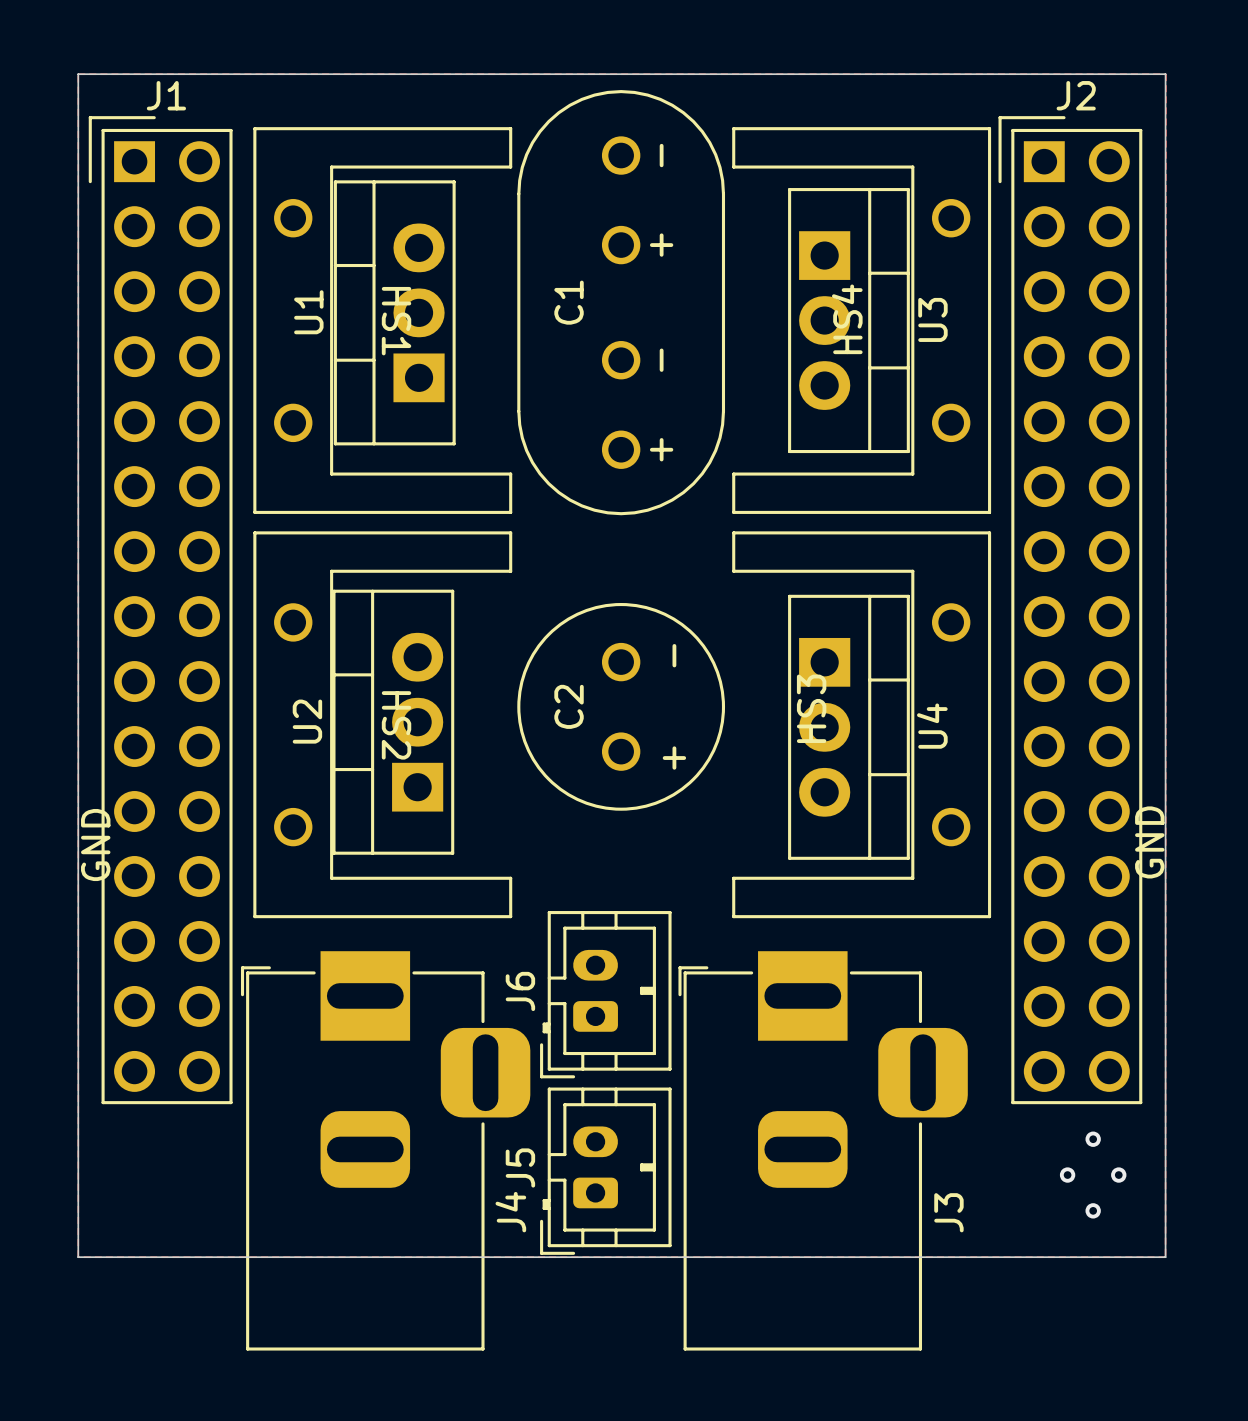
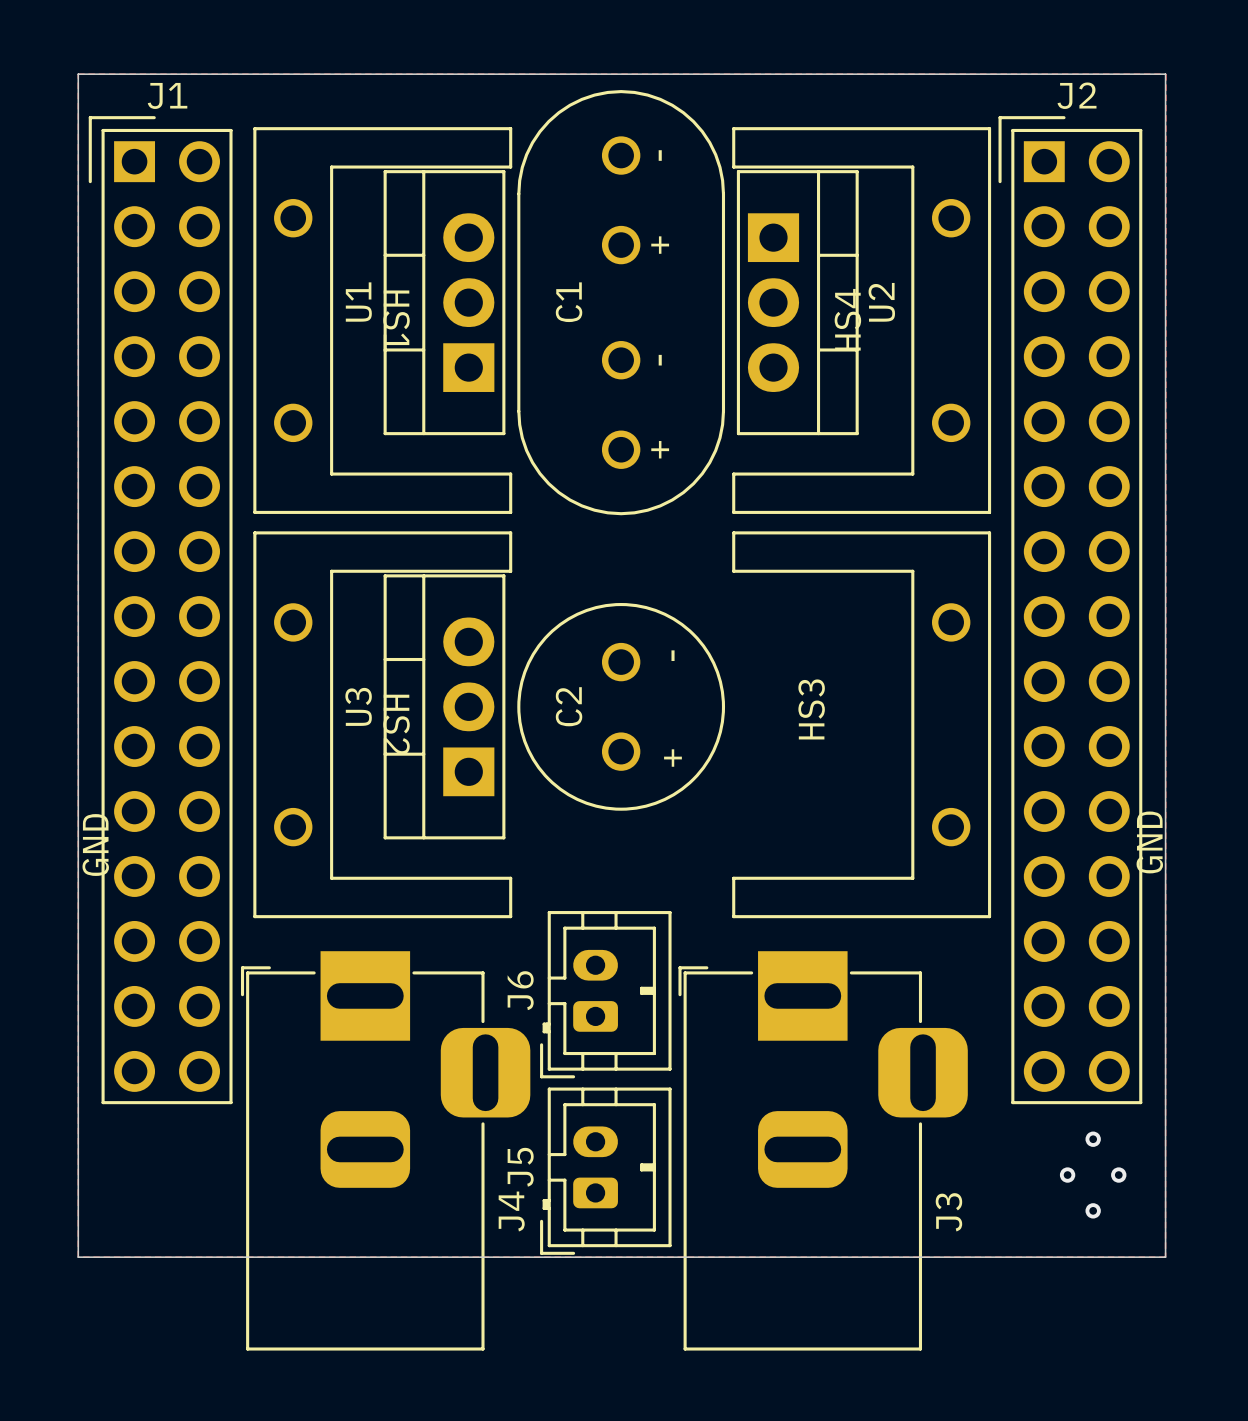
U1 position: (394, 312) -> (444, 302)
U3 rotation: 0° (848, 320) -> 180° (444, 706)
U3 position: (848, 320) -> (444, 706)
U2 rotation: 0° (393, 722) -> 180° (797, 302)
U2 position: (393, 722) -> (797, 302)
U4: (848, 727) -> none

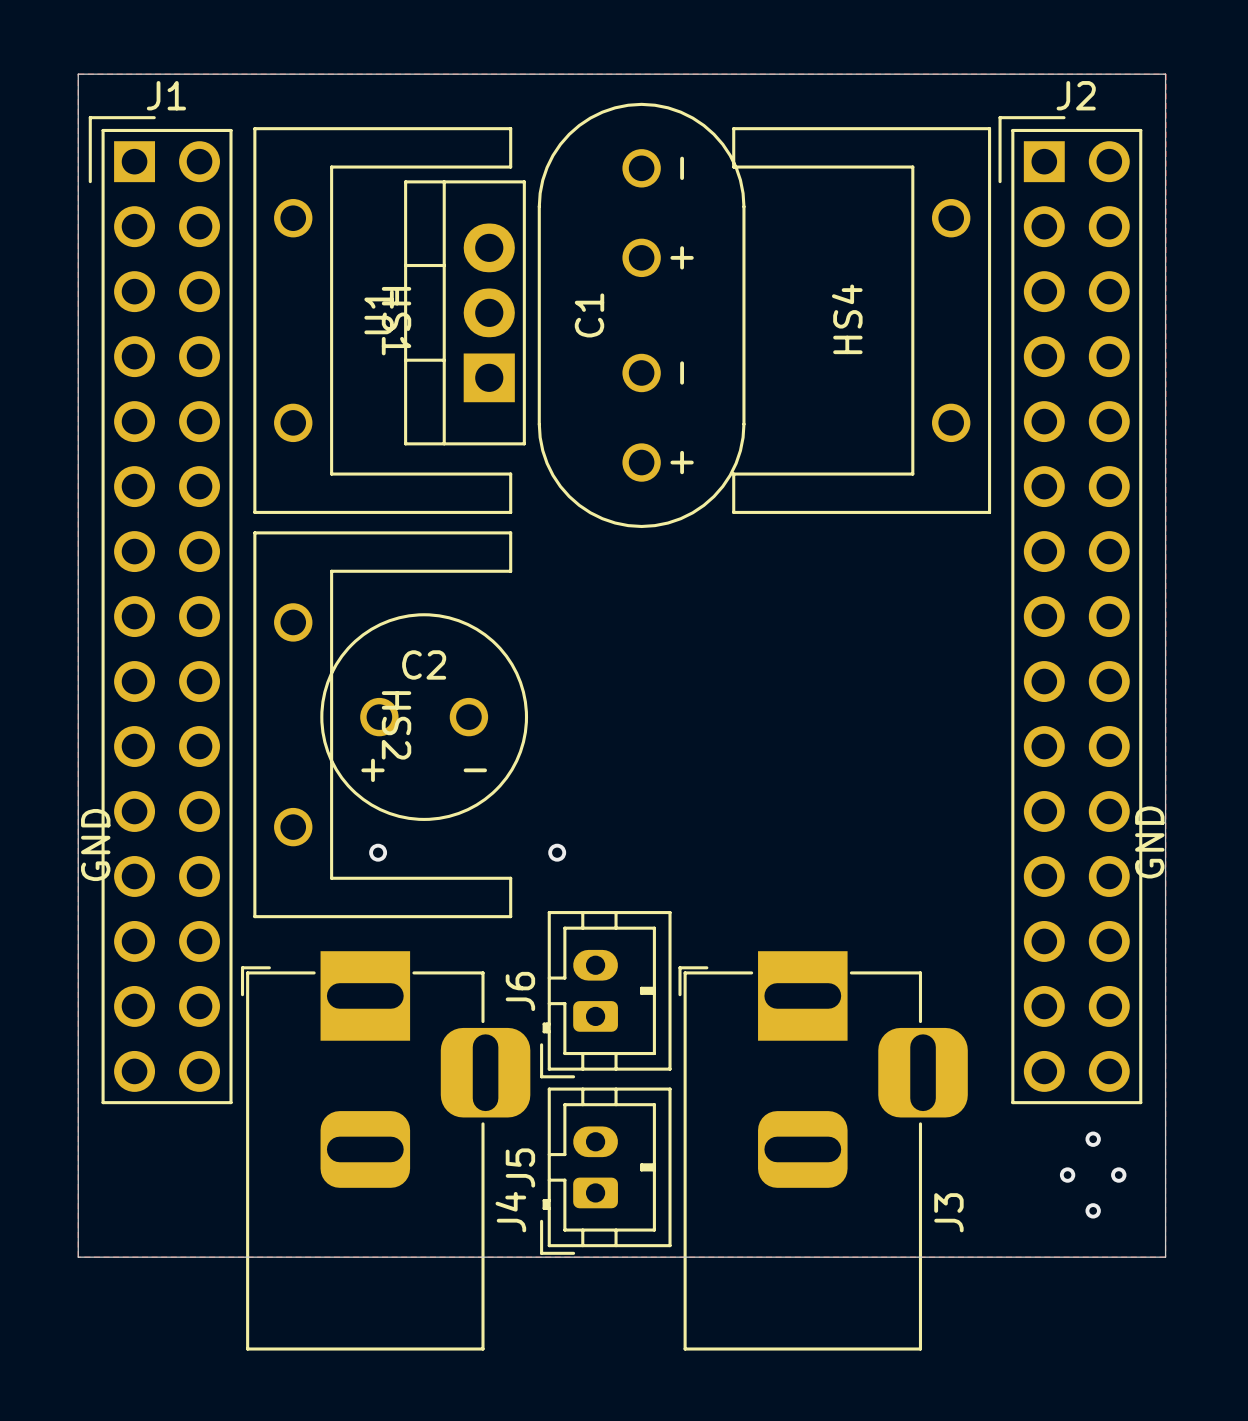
U1 position: (444, 302) -> (464, 312)
C1 position: (621, 302) -> (641, 315)
U2: (797, 302) -> none
U3: (444, 706) -> none
C2 rotation: 0° (621, 706) -> 90° clockwise (424, 717)
C2 position: (621, 706) -> (424, 717)
HS3: (861, 724) -> none
via: none -> (378, 852)
via: none -> (557, 852)

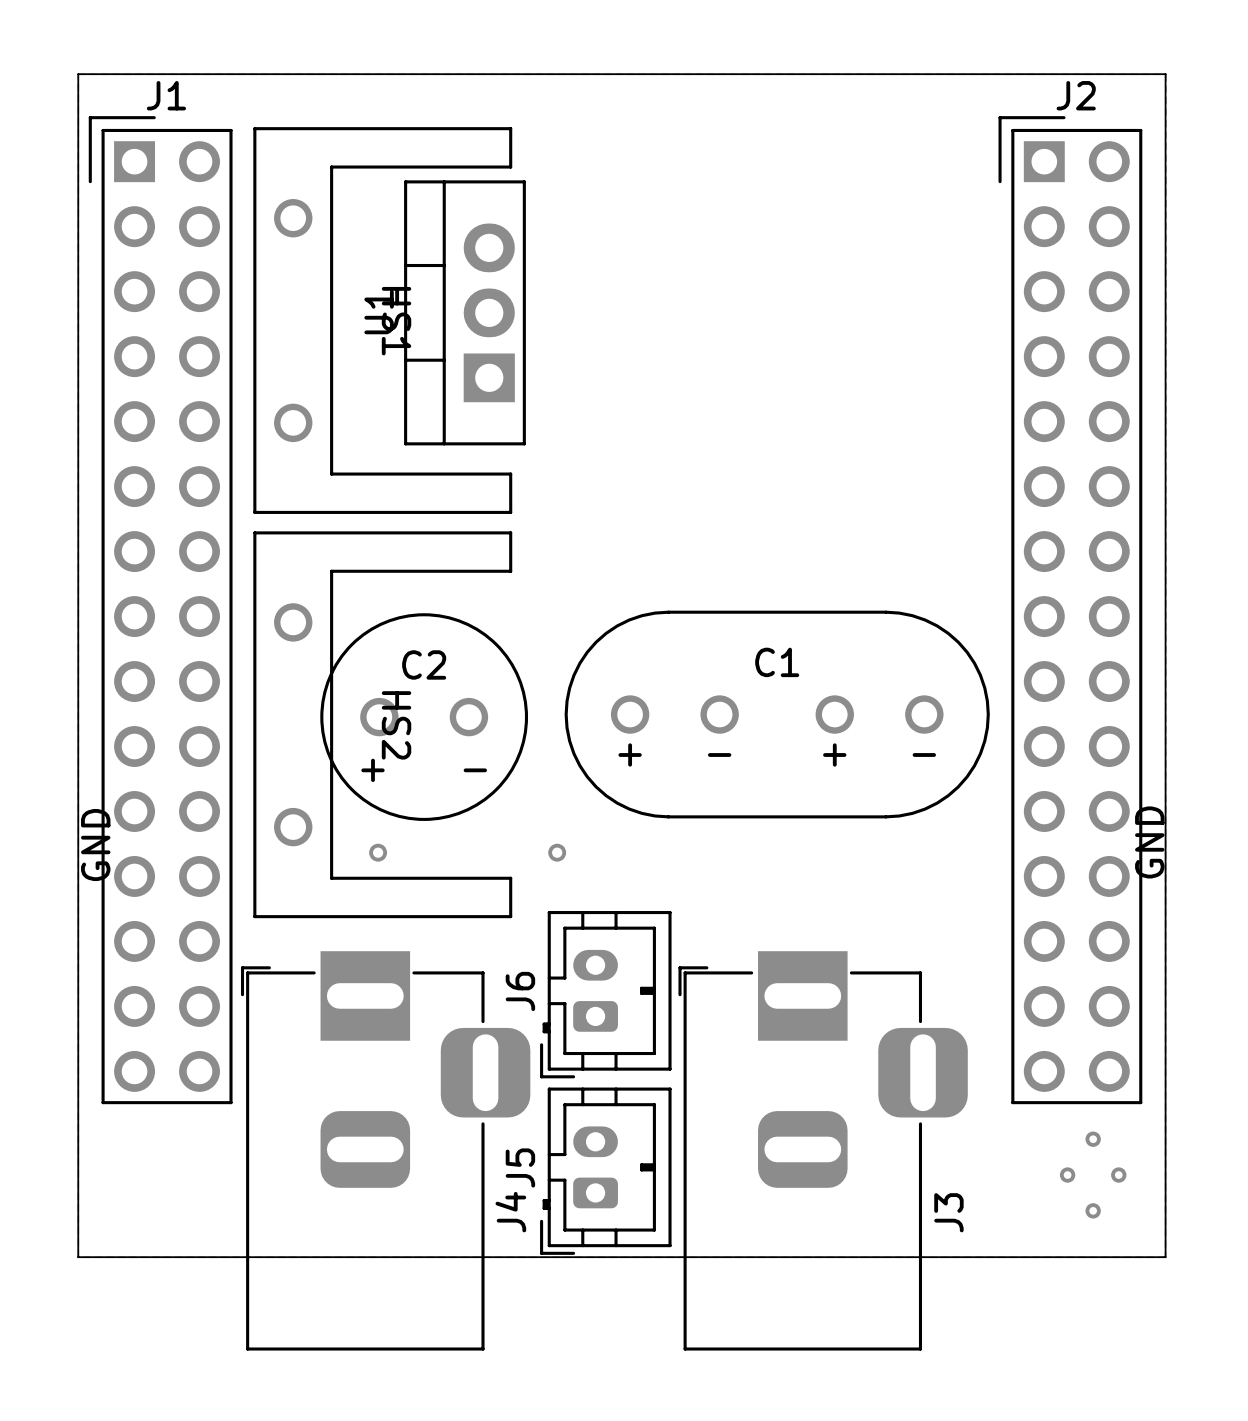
C1 rotation: 0° (641, 315) -> 90° clockwise (777, 714)
C1 position: (641, 315) -> (777, 714)
HS4: (861, 320) -> none

